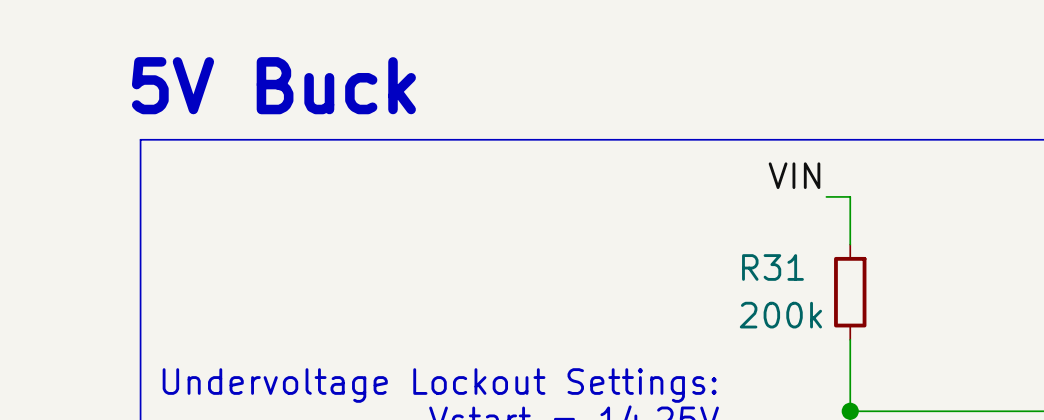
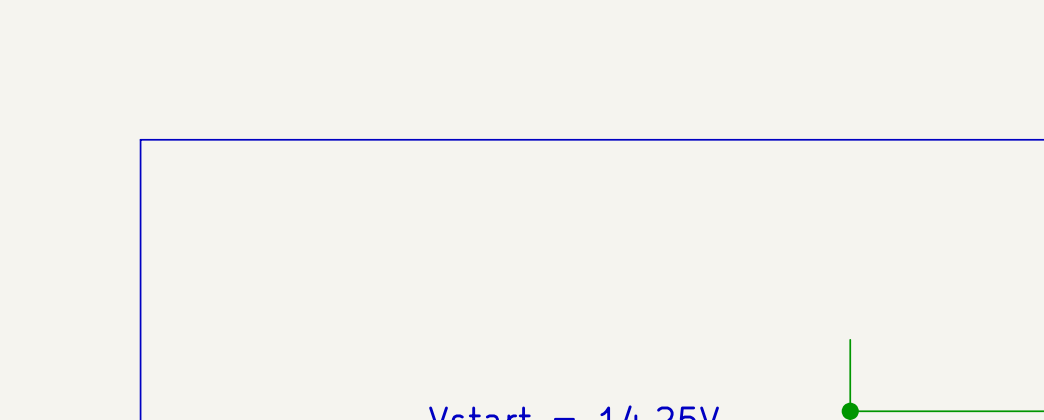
text: 5V Buck (273, 85) -> none
label: VIN (794, 175) -> none
wire: (826, 196) (850, 196) (850, 244) -> none
R31: 200k (850, 292) -> none
text: Undervoltage Lockout Settings: (439, 385) -> none

